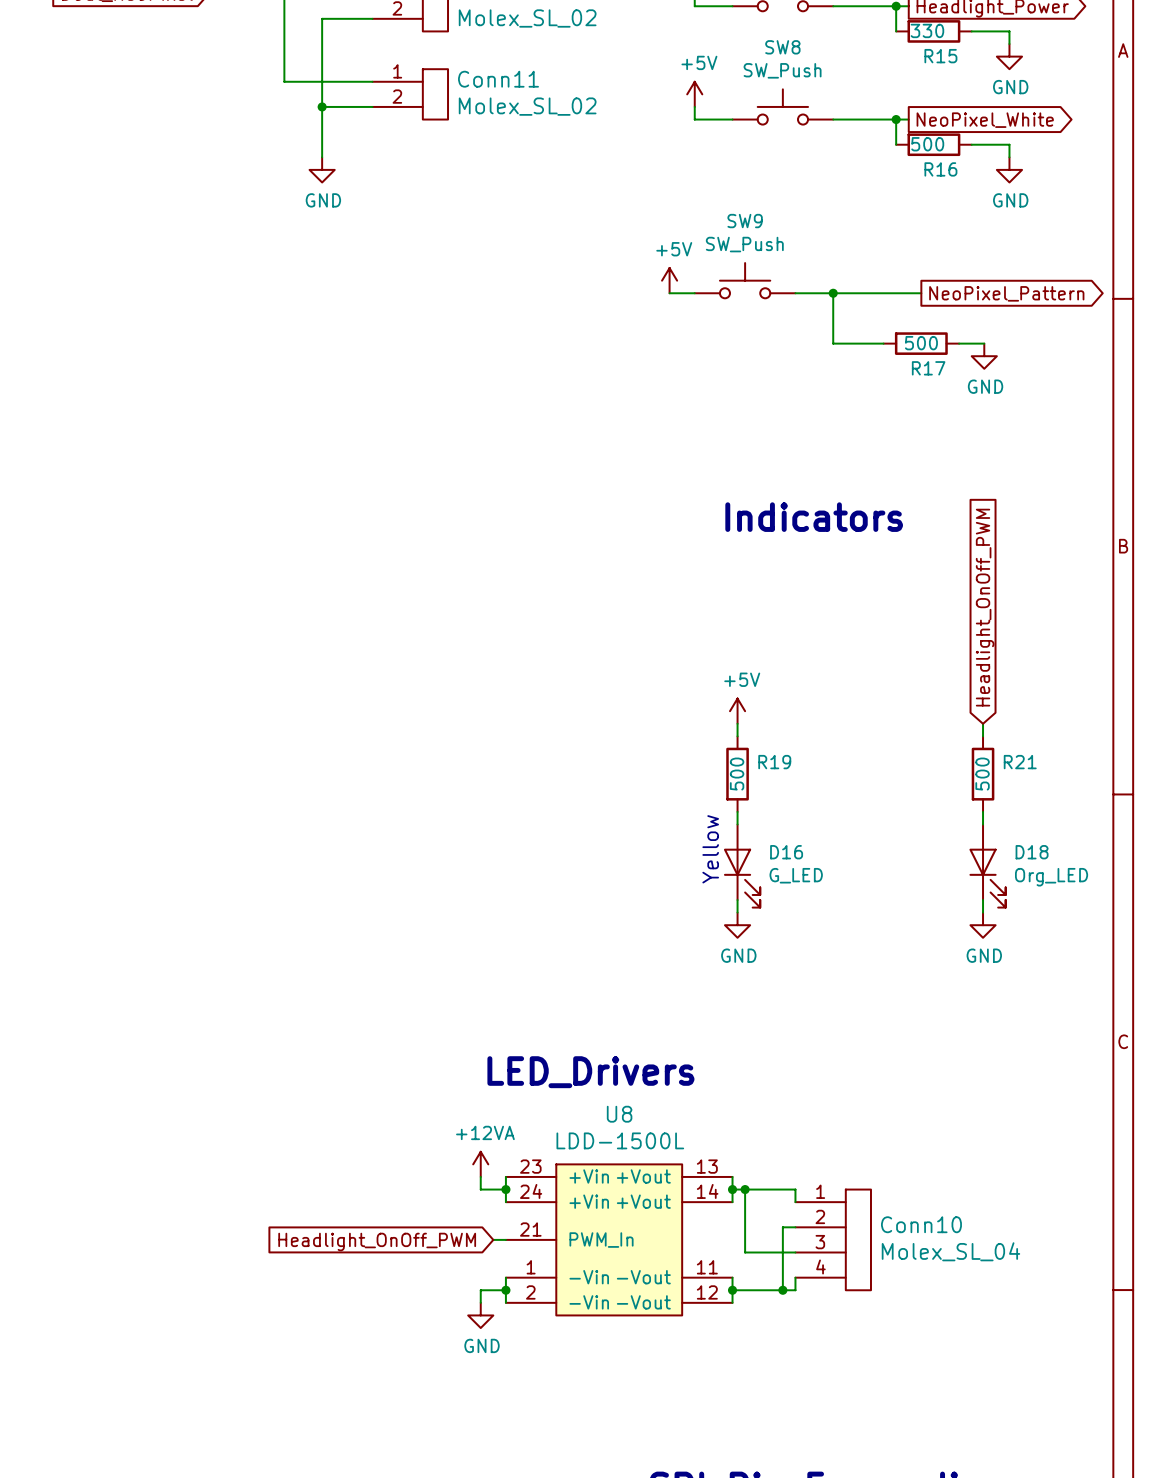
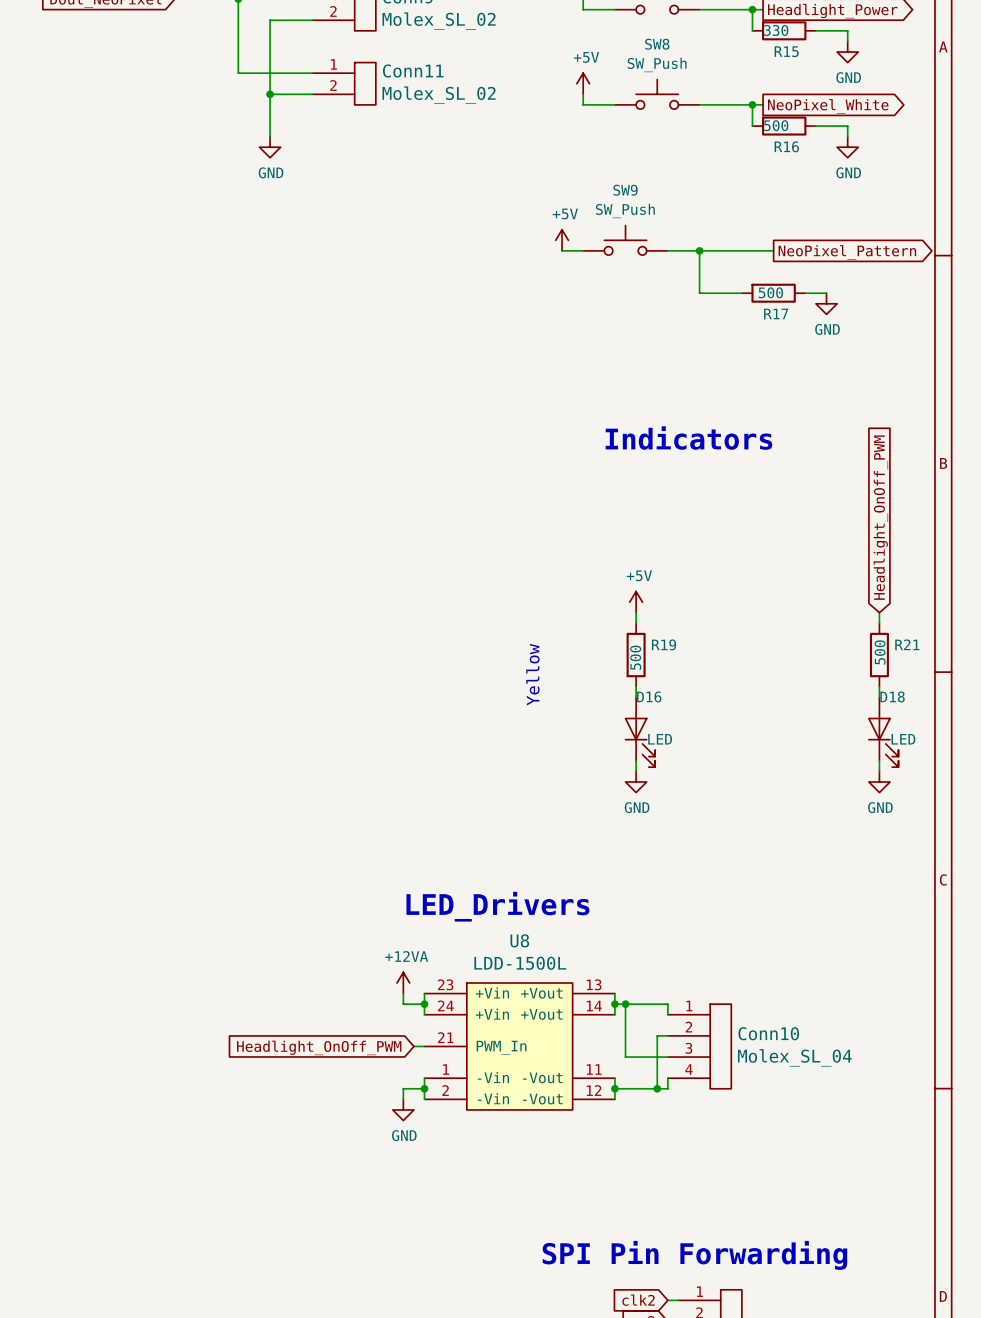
global label position: Headlight_OnOff_PWM (985, 607) -> Headlight_OnOff_PWM (880, 517)
power symbol position: +5V (737, 711) -> +5V (636, 602)
wire: (737, 723) (737, 736) -> (636, 612) (636, 623)
wire: (983, 723) (983, 736) -> (879, 612) (879, 623)
R19 position: (737, 774) -> (636, 655)
R21 value position: 500 (982, 774) -> 500 (880, 652)
R21 position: (983, 774) -> (879, 655)
wire: (737, 811) (737, 824) -> (636, 686) (636, 697)
wire: (983, 811) (983, 824) -> (879, 686) (879, 697)
text position: Yellow (710, 849) -> Yellow (532, 674)
D16 name position: D16 (786, 852) -> D16 (649, 696)
D18 name position: D18 (1032, 852) -> D18 (892, 696)
D16 position: (742, 866) -> (639, 732)
D18 position: (987, 866) -> (883, 732)
D16 value: G_LED (796, 875) -> LED (660, 739)
D18 value: Org_LED (1051, 877) -> LED (903, 739)
wire: (737, 900) (737, 912) -> (636, 760) (636, 771)
wire: (983, 900) (983, 912) -> (879, 760) (879, 771)
power symbol position: GND (737, 925) -> GND (636, 781)
power symbol position: GND (983, 925) -> GND (879, 781)

